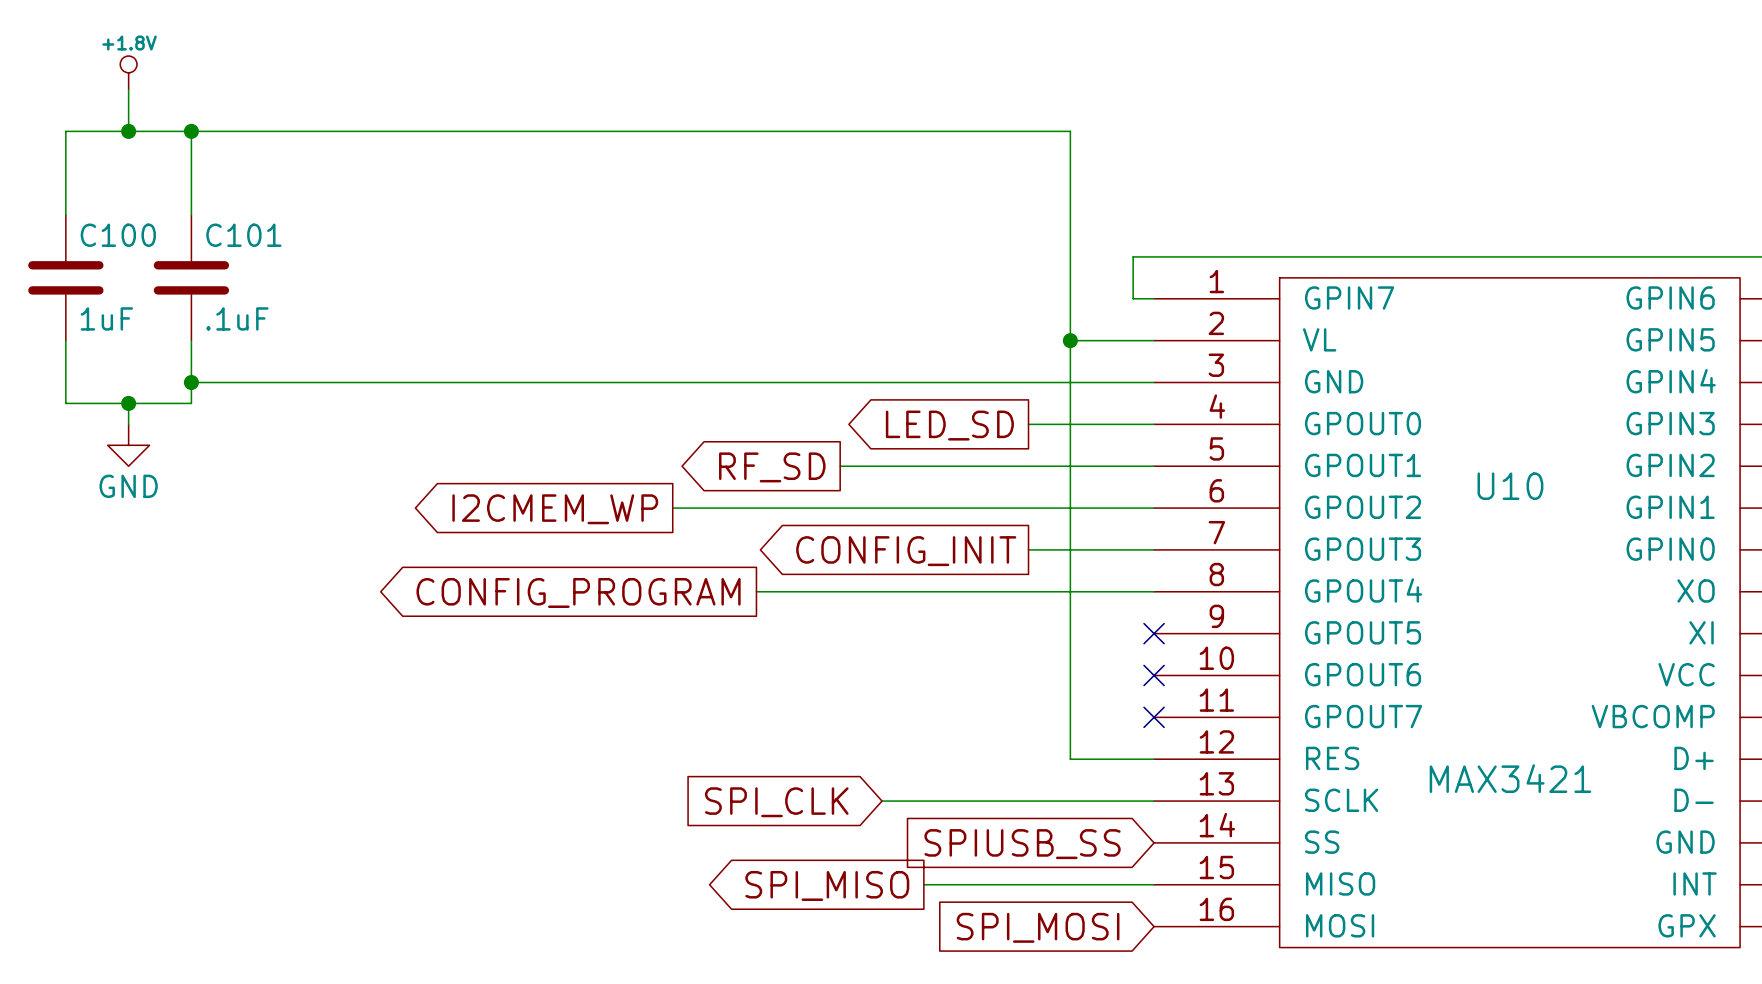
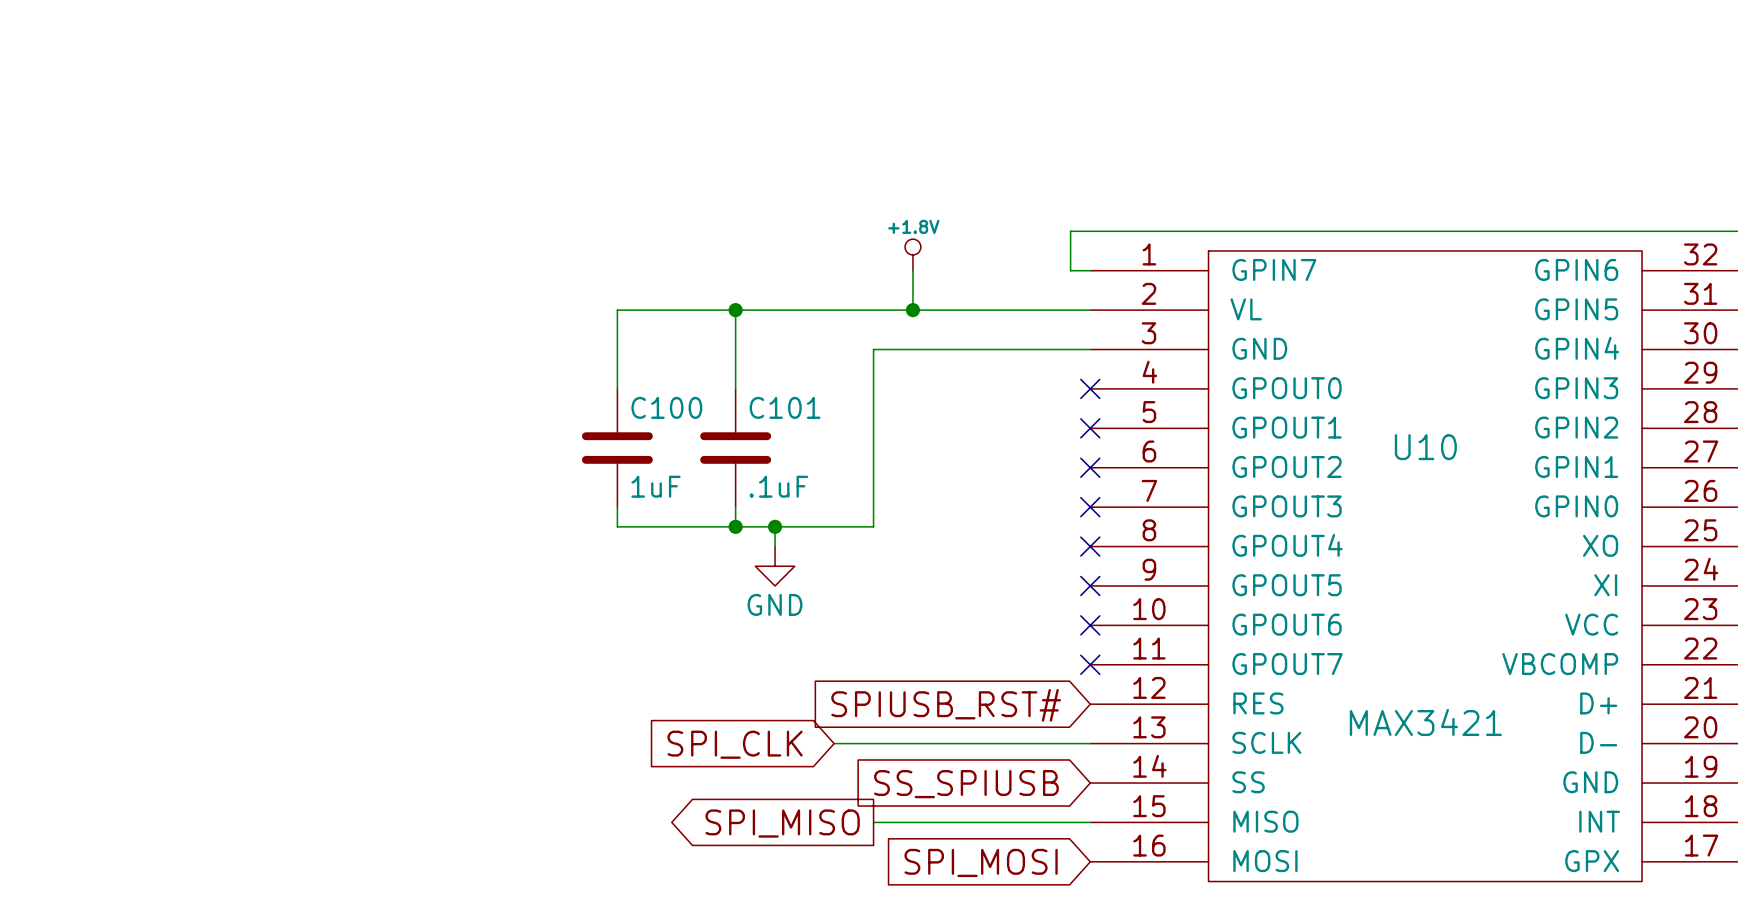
power symbol: +1.8V (128, 72) -> none
wire: (128, 89) (128, 131) -> none
junction: (128, 131) -> none
wire: (191, 131) (191, 215) -> none
junction: (191, 131) -> none
wire: (65, 215) (65, 131) (1070, 131) (1070, 759) (1154, 759) -> none
C100 position: (65, 277) -> (617, 448)
C101 position: (191, 277) -> (735, 448)
power symbol: none -> +1.8V (912, 254)
wire: none -> (912, 270) (912, 310)
wire: (65, 340) (65, 403) (191, 403) (191, 340) -> none
wire: none -> (735, 310) (735, 388)
junction: none -> (735, 310)
junction: none -> (912, 310)
wire: none -> (1011, 310) (617, 310) (617, 388)
junction: (1070, 340) -> none
wire: (191, 382) (923, 382) -> (617, 507) (617, 526) (873, 526) (873, 349)
junction: (191, 382) -> none
wire: (128, 403) (128, 424) -> none
junction: (128, 403) -> none
wire: (1028, 424) (1154, 424) -> none
no-connect mark: none -> (1090, 388)
global label: LED_SD (949, 425) -> none
power symbol: GND (128, 445) -> none
wire: (840, 466) (1154, 466) -> none
no-connect mark: none -> (1090, 428)
global label: RF_SD (772, 467) -> none
wire: (672, 508) (1154, 508) -> none
no-connect mark: none -> (1090, 467)
global label: I2CMEM_WP (555, 509) -> none
wire: none -> (735, 507) (735, 526)
wire: (1028, 549) (1154, 549) -> none
no-connect mark: none -> (1090, 507)
global label: CONFIG_INIT (906, 551) -> none
junction: none -> (735, 526)
wire: none -> (775, 526) (775, 546)
junction: none -> (775, 526)
wire: (756, 591) (1154, 591) -> none
no-connect mark: none -> (1090, 546)
global label: CONFIG_PROGRAM (578, 592) -> none
power symbol: none -> GND (775, 566)
global label: none -> SPIUSB_RST# (946, 705)
global label: SPIUSB_SS (1022, 844) -> SS_SPIUSB (966, 784)

